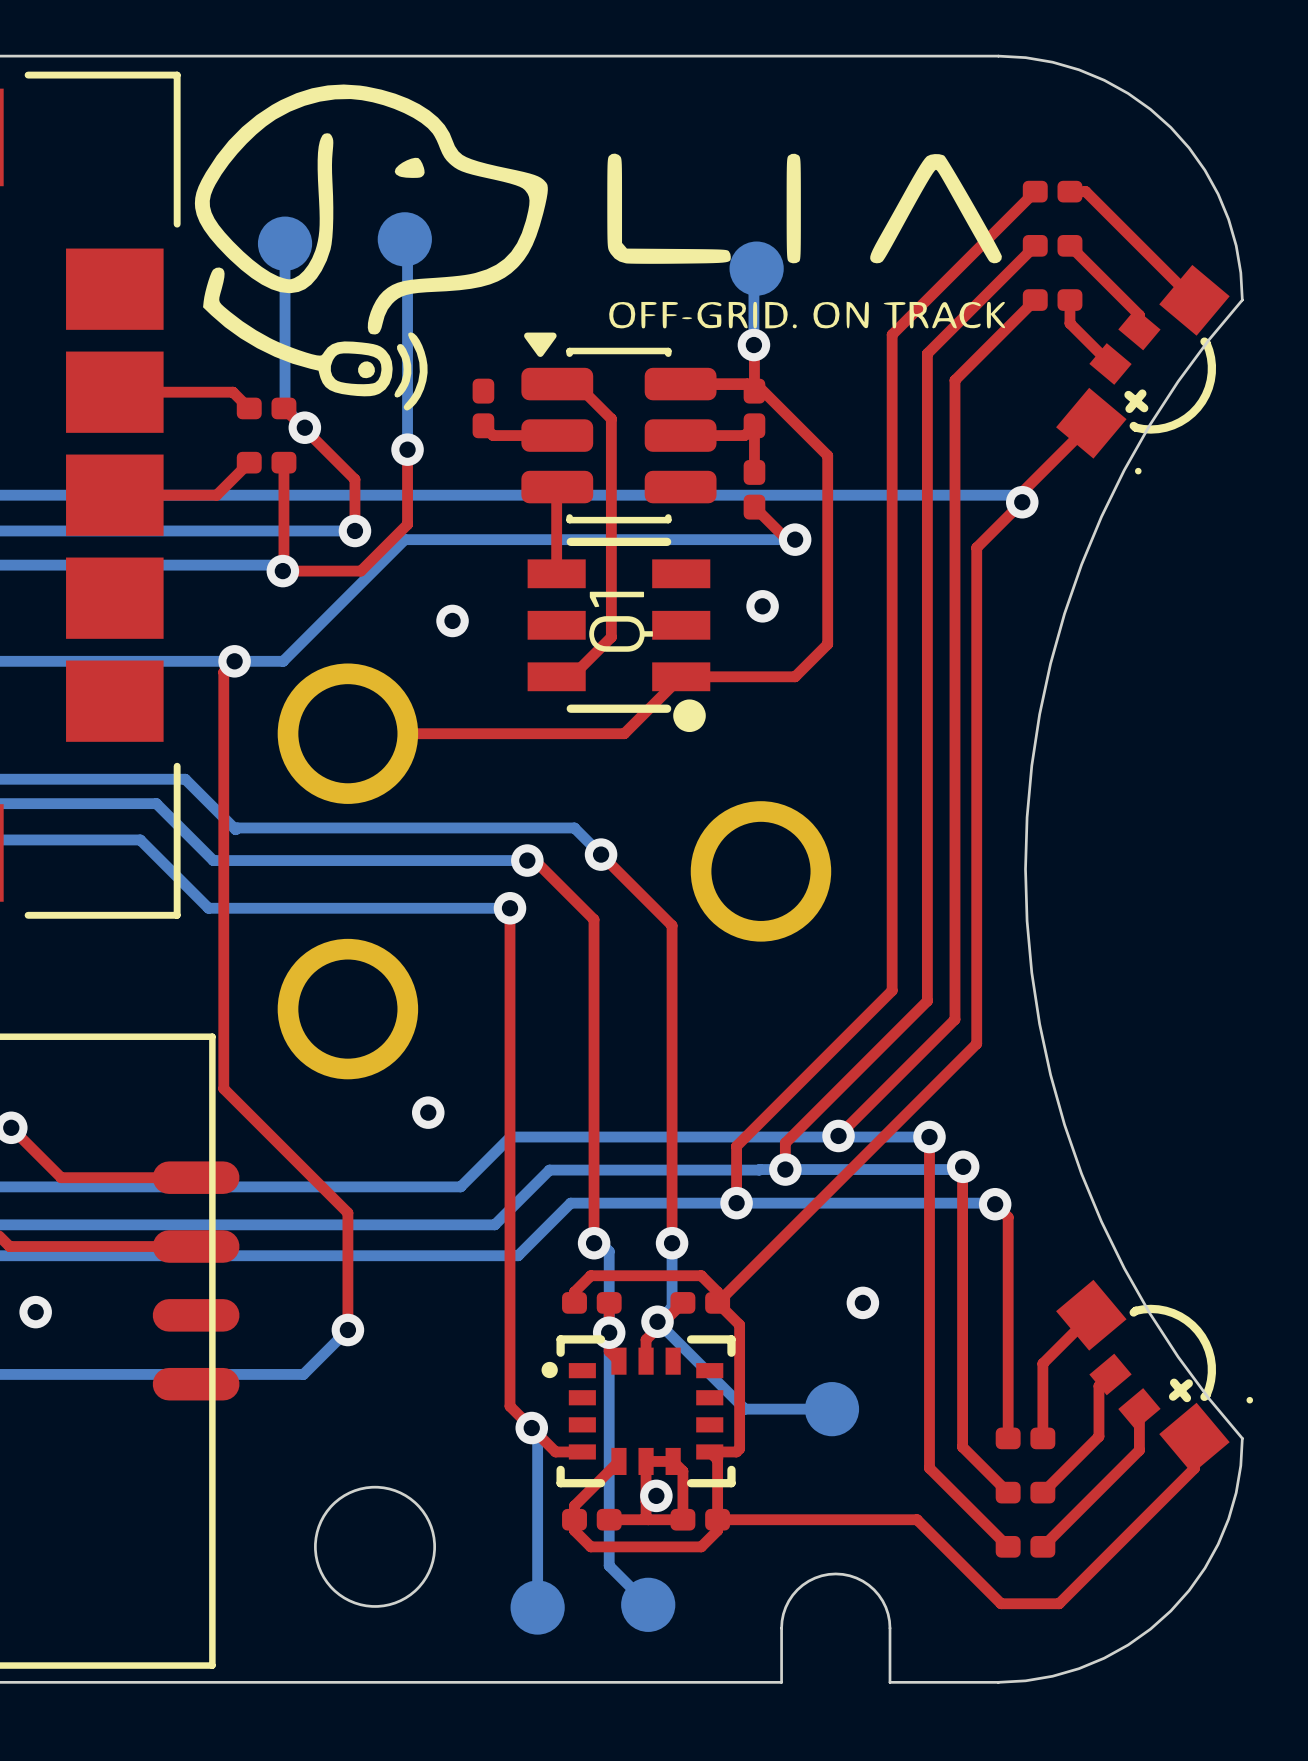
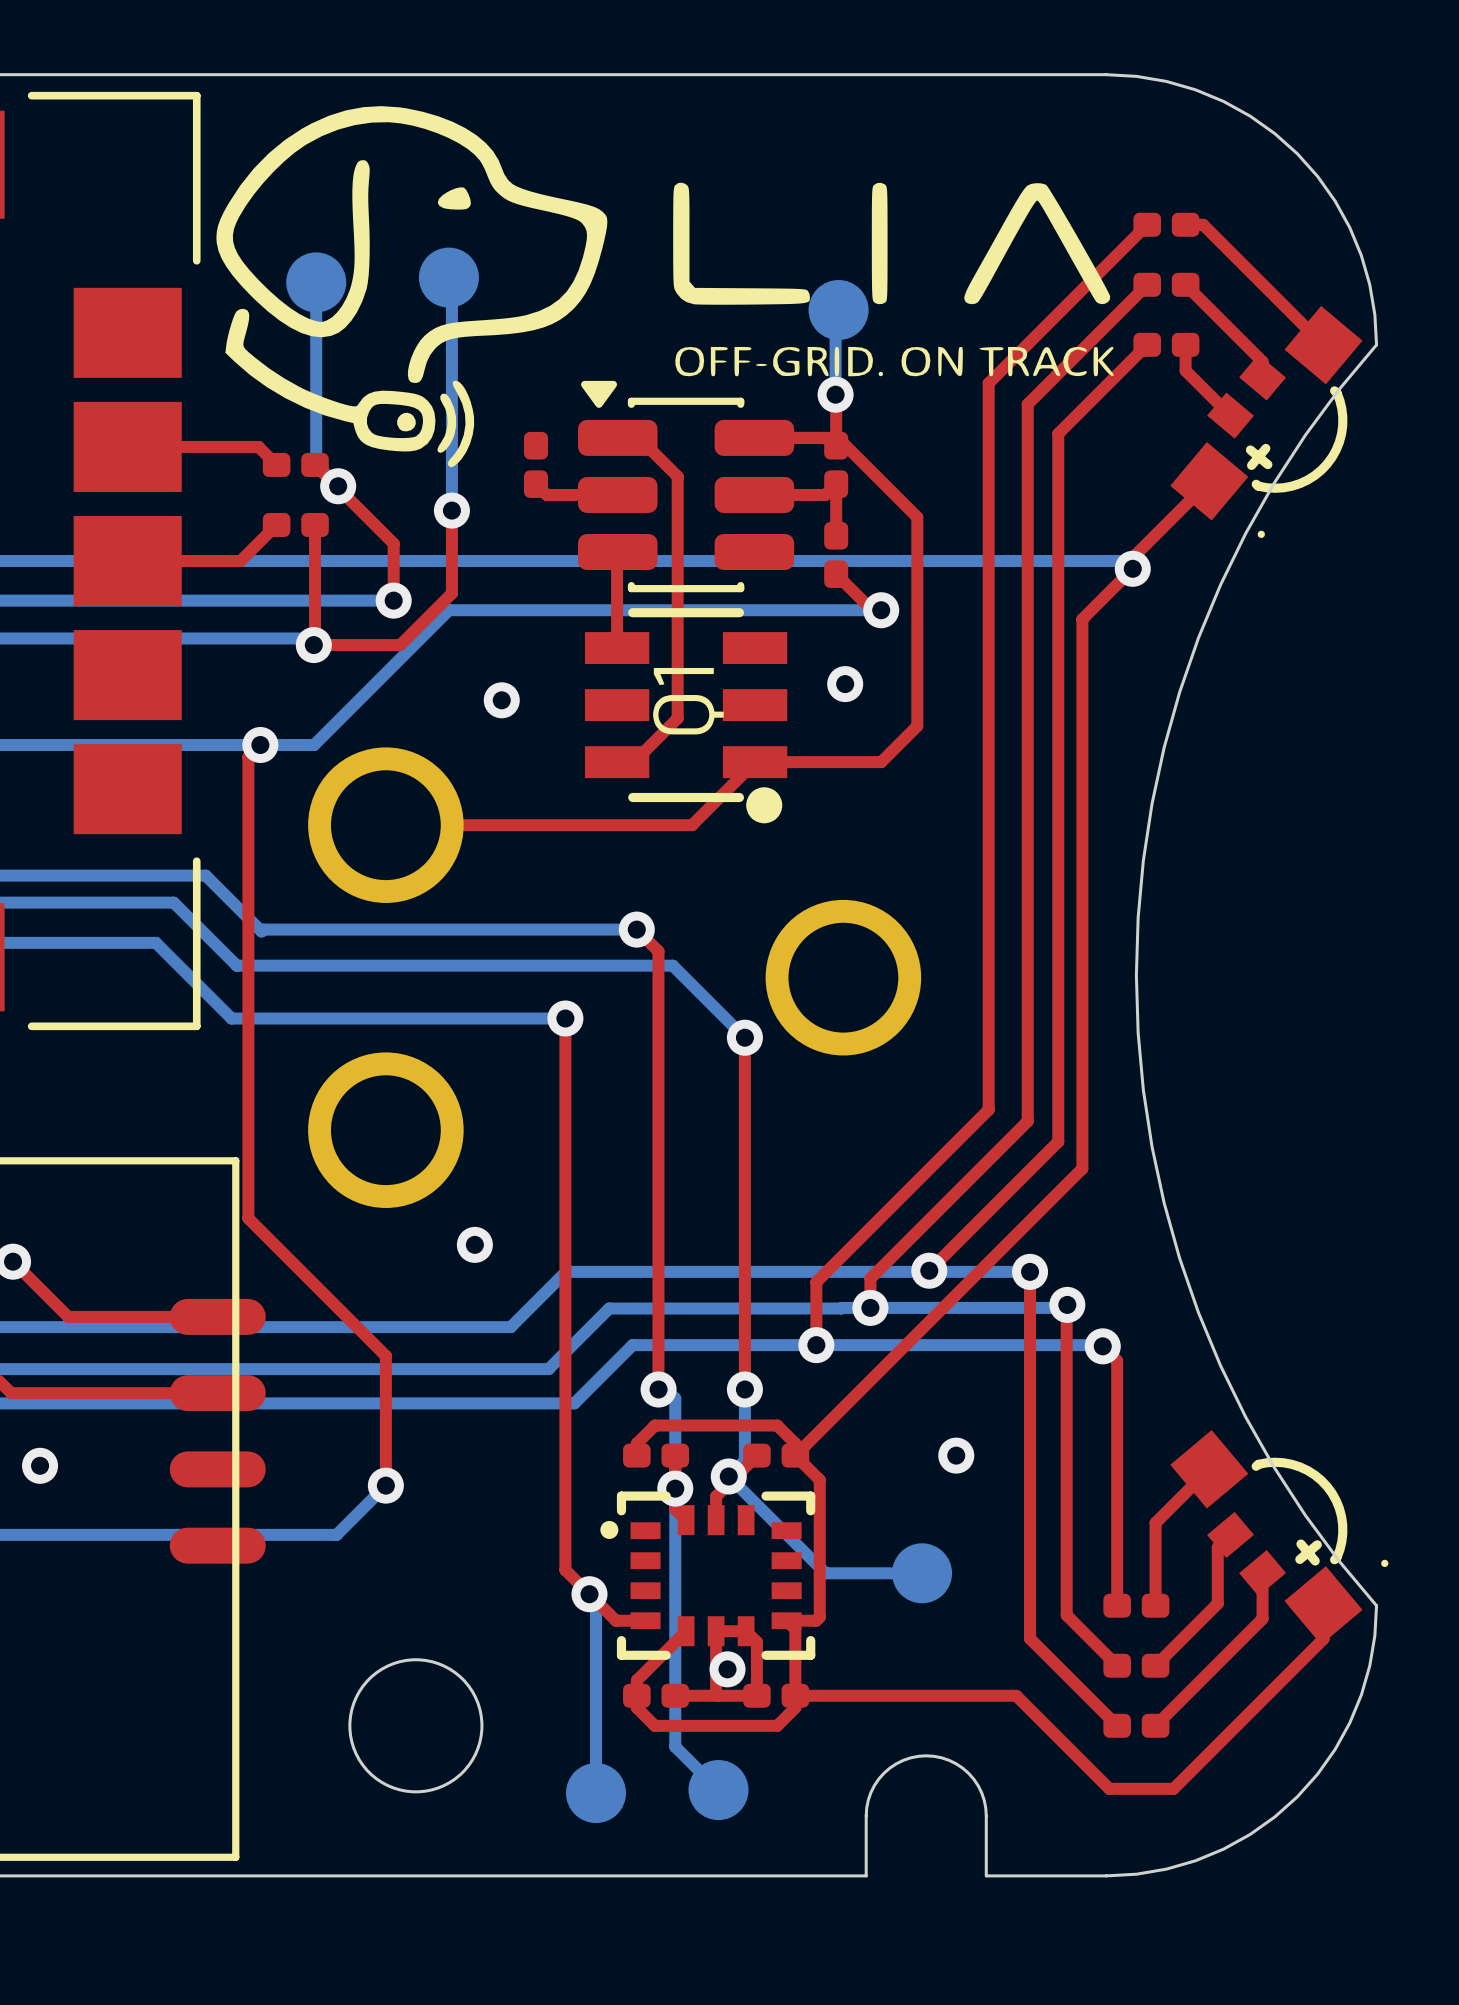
bottom track: (574, 827) (601, 854) -> none
top track: (601, 854) (672, 925) -> none
via position: (601, 854) -> (636, 929)
top track: (527, 860) (534, 860) (594, 919) -> (636, 929) (658, 951) (658, 1031)
bottom track: none -> (584, 965) (672, 965) (744, 1037)
via: (527, 860) -> none
via: none -> (744, 1037)

